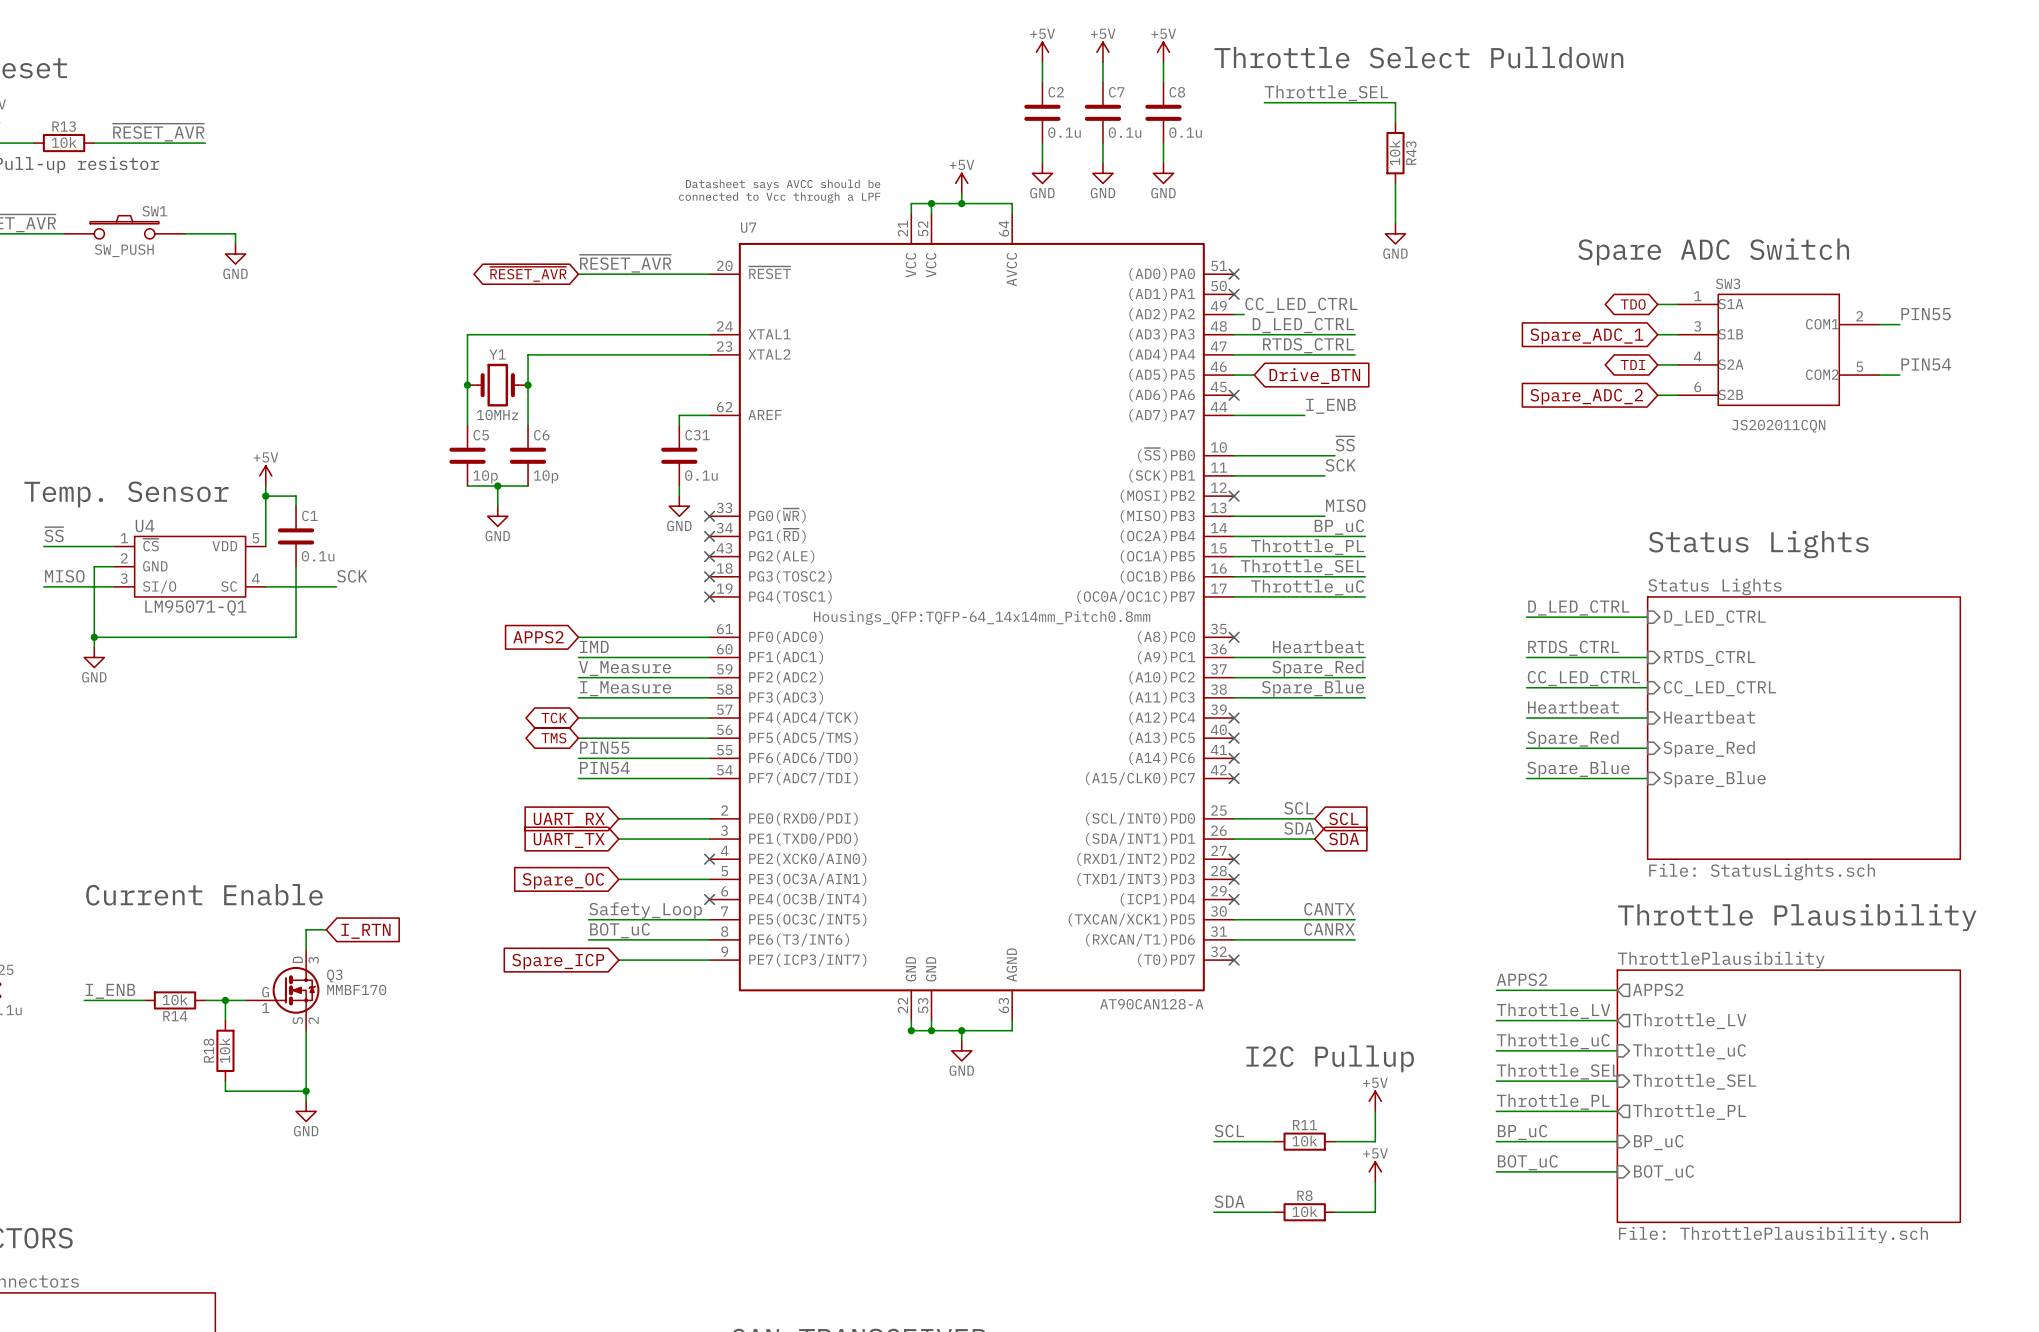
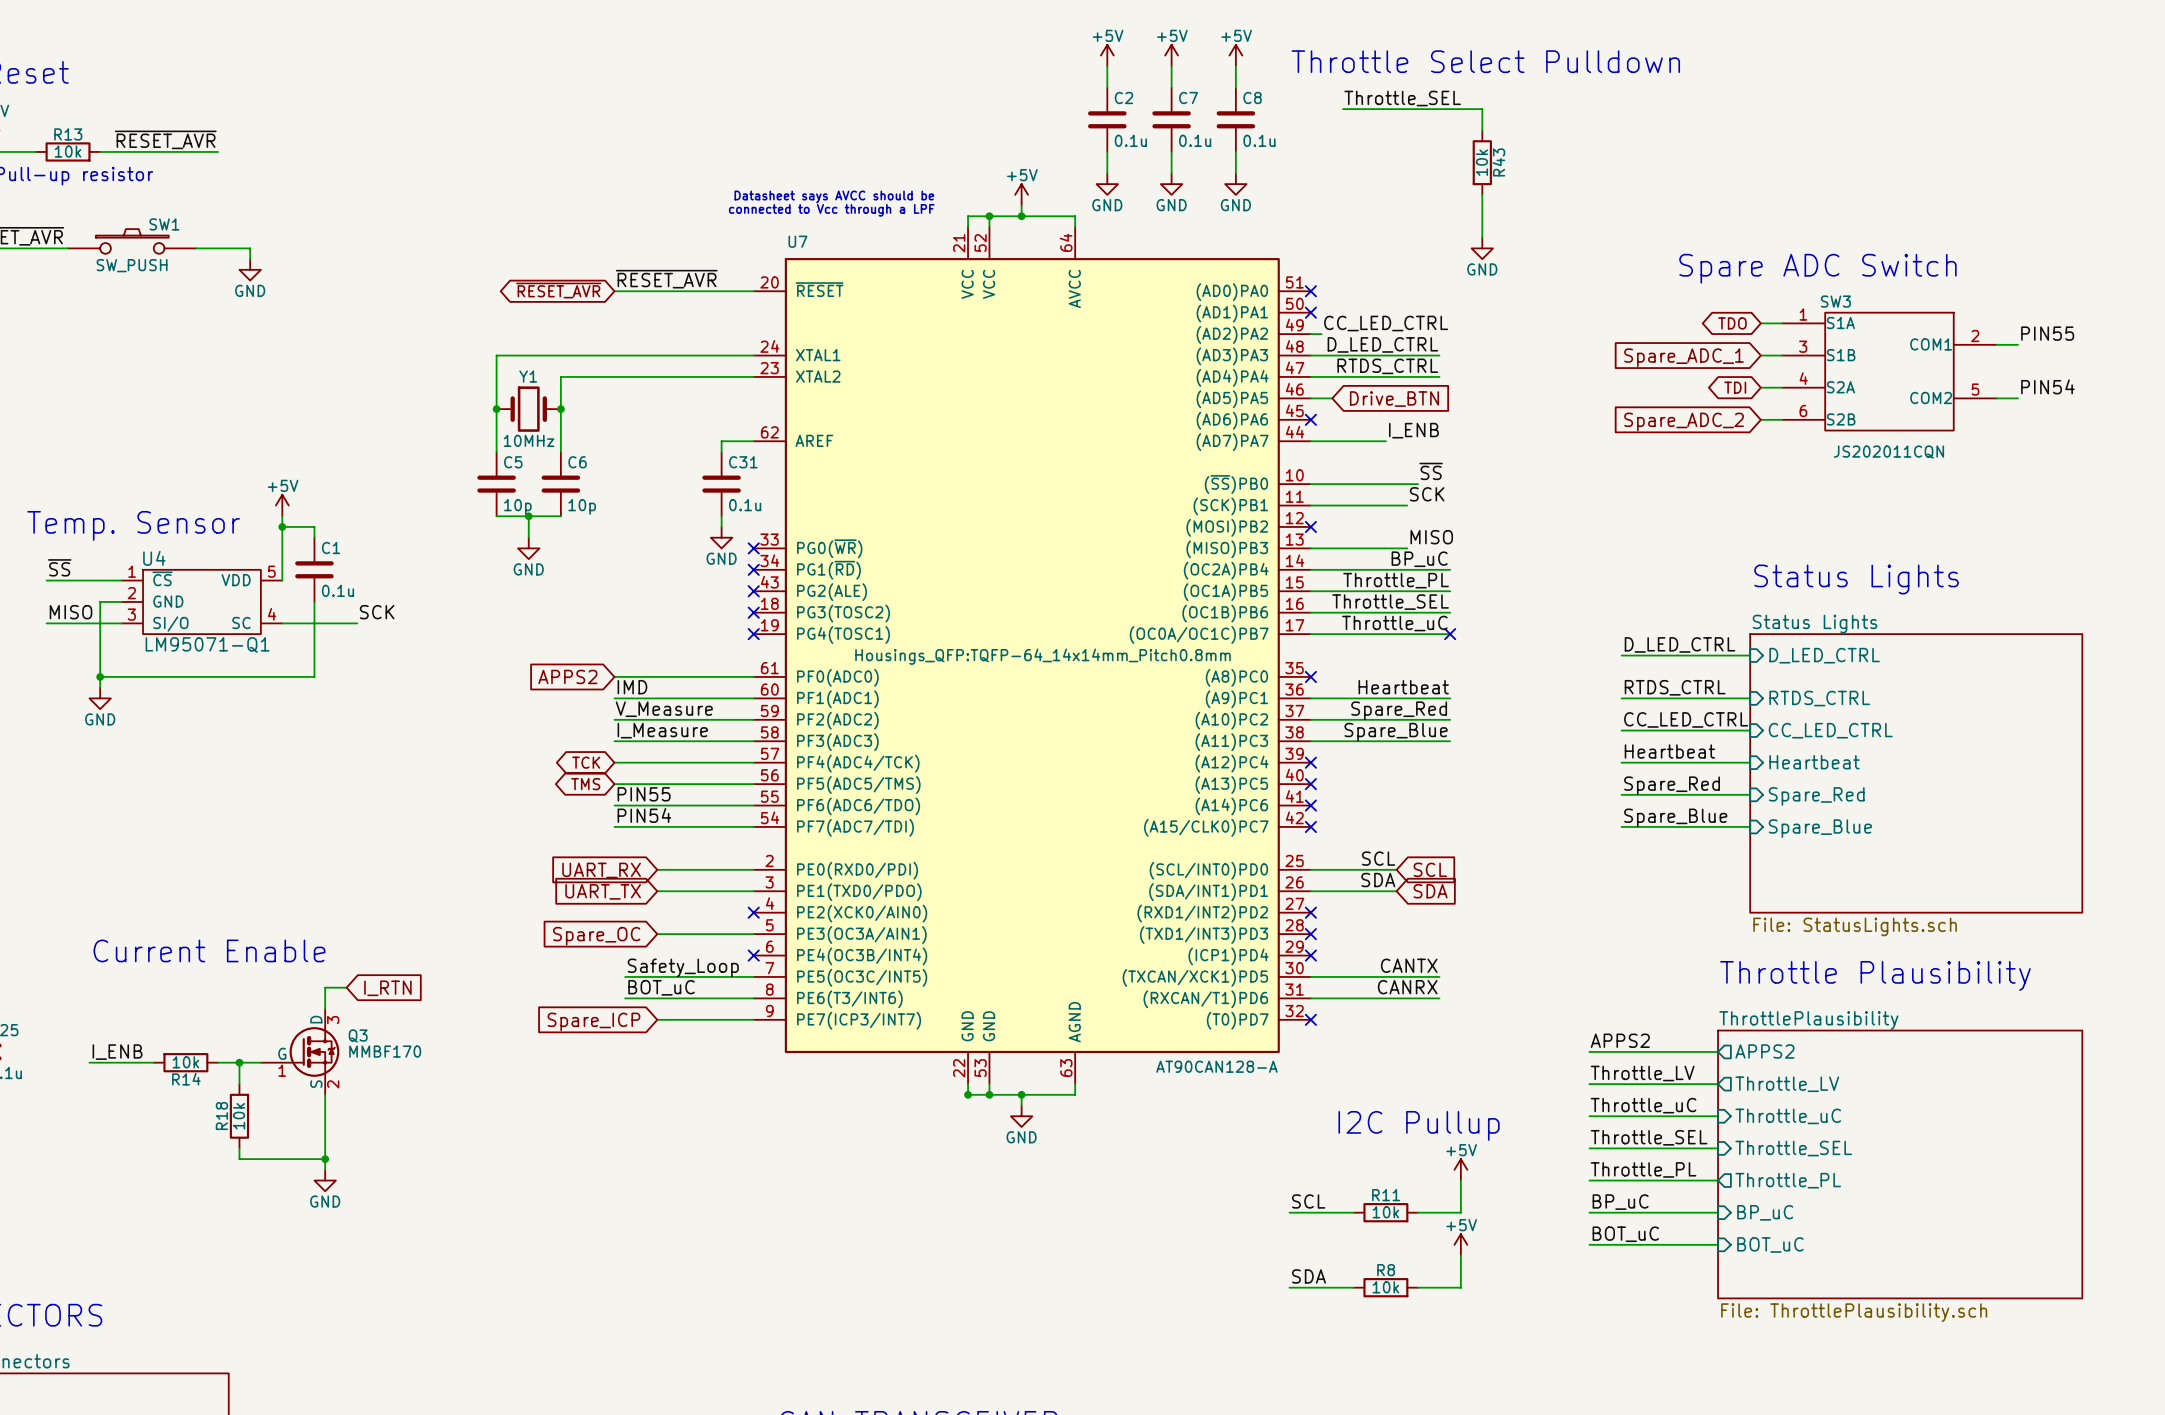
no-connect mark: none -> (1450, 634)

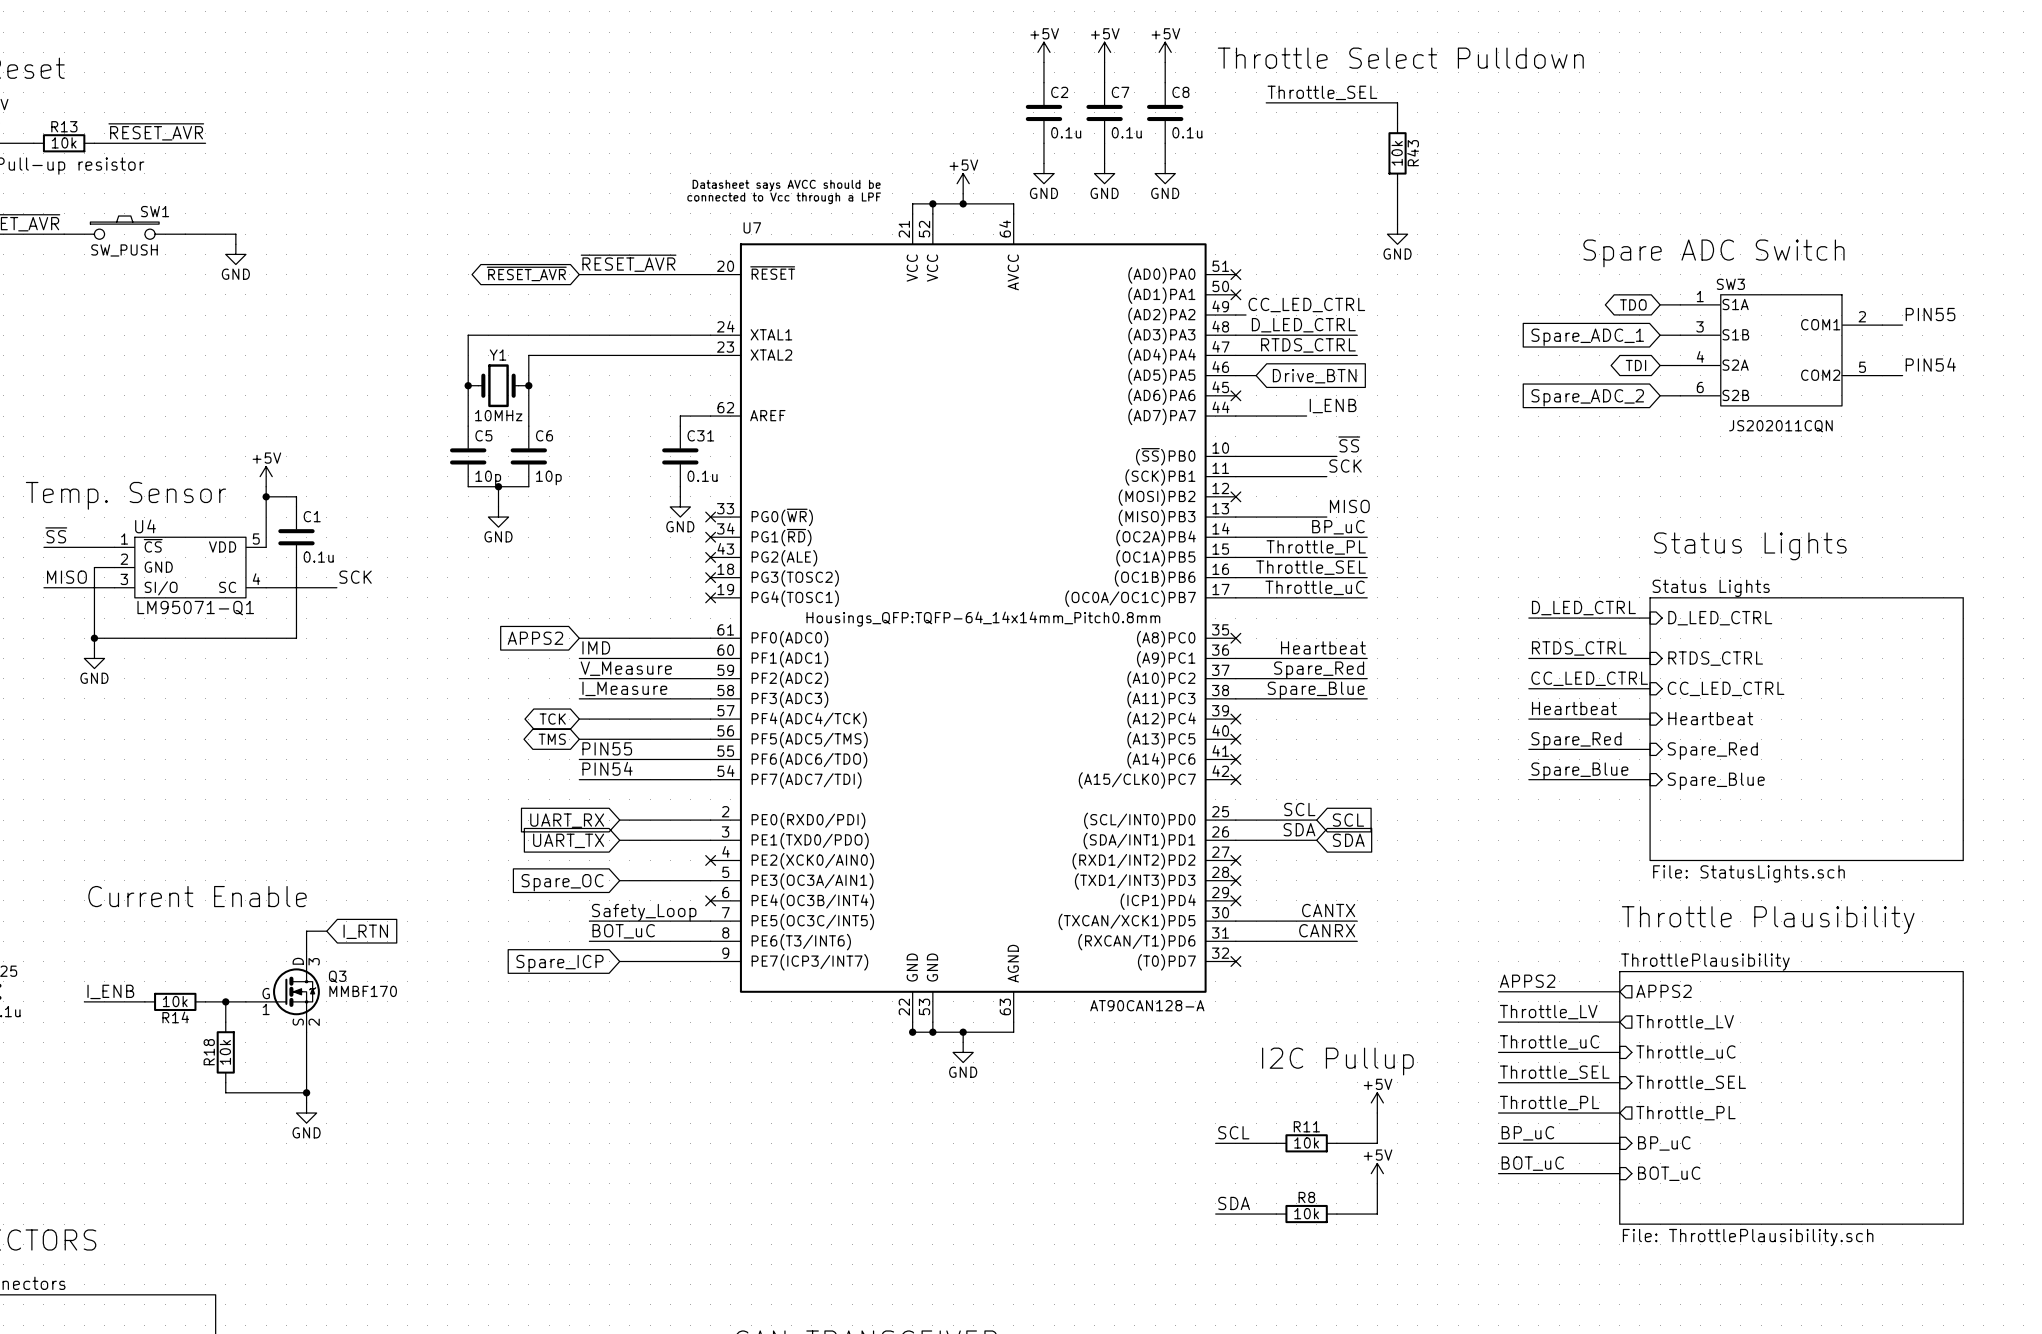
no-connect mark: (1450, 634) -> none

